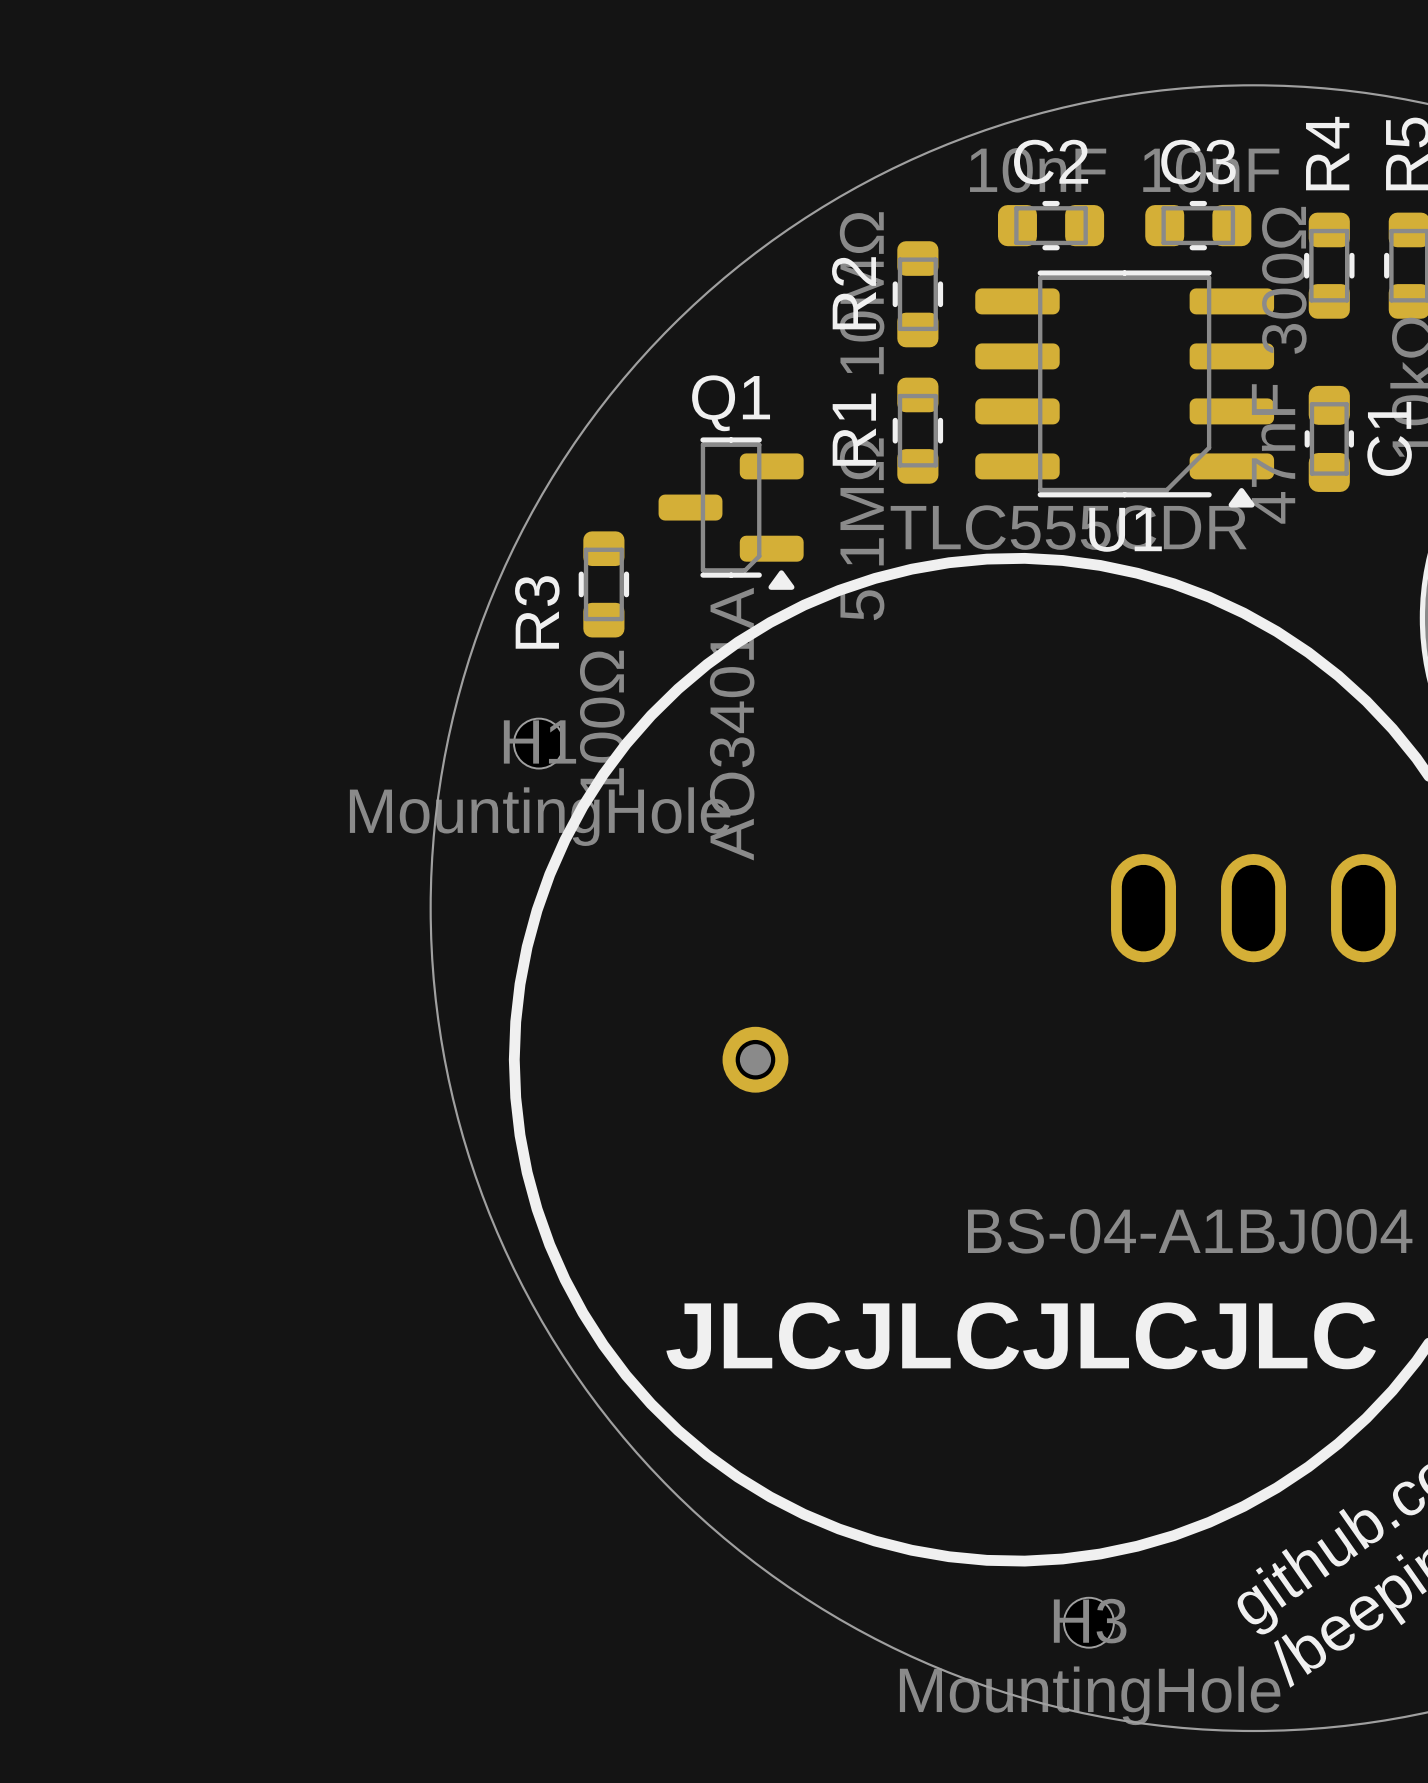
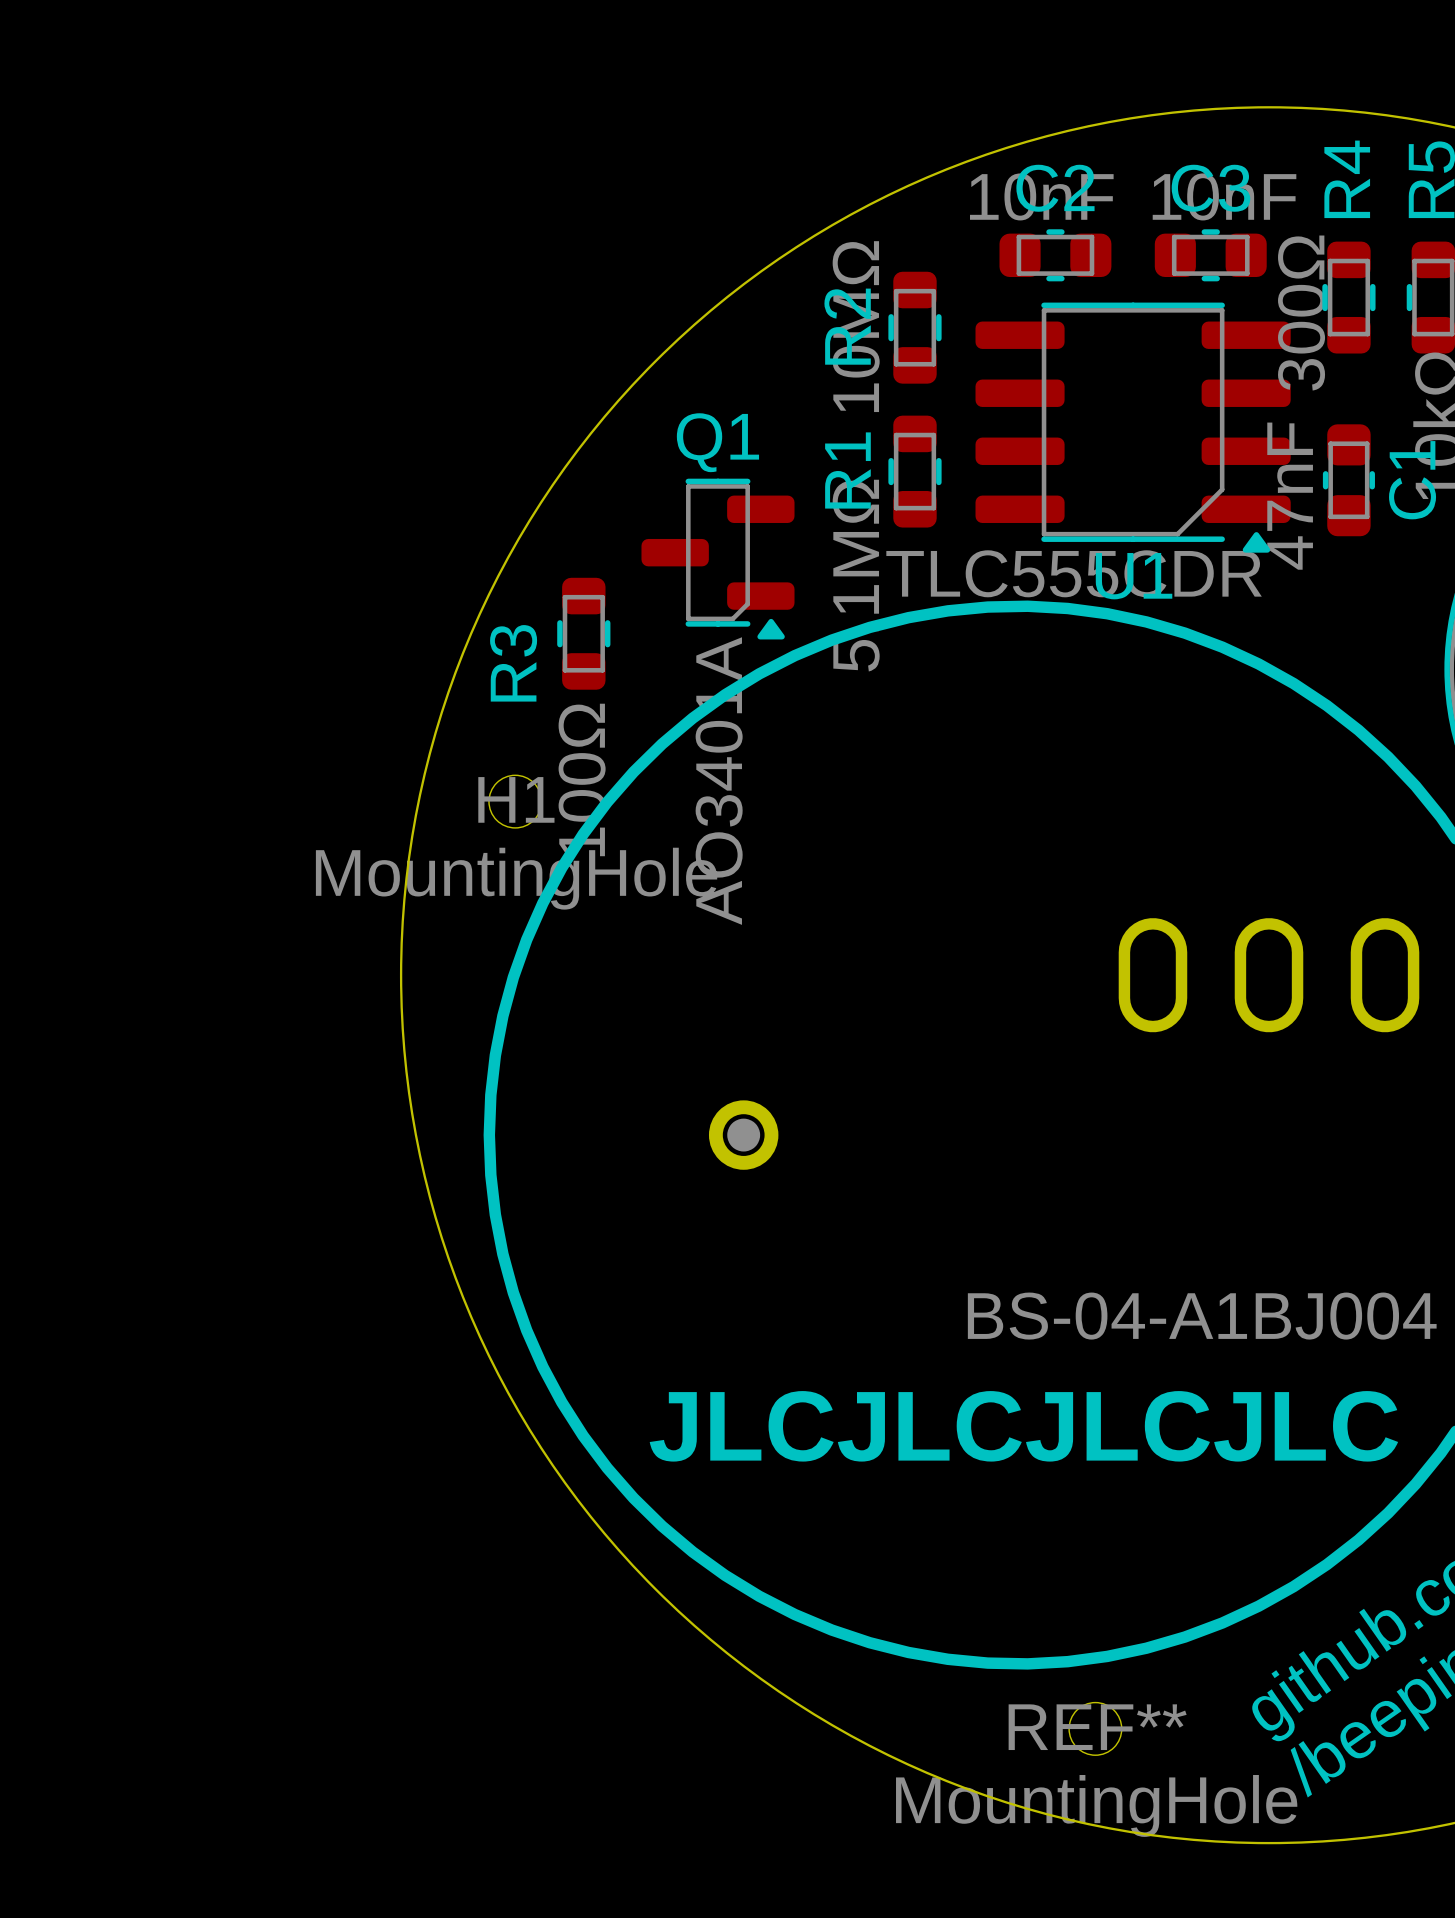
H3 name: H3 (1090, 1621) -> REF** (1097, 1727)

